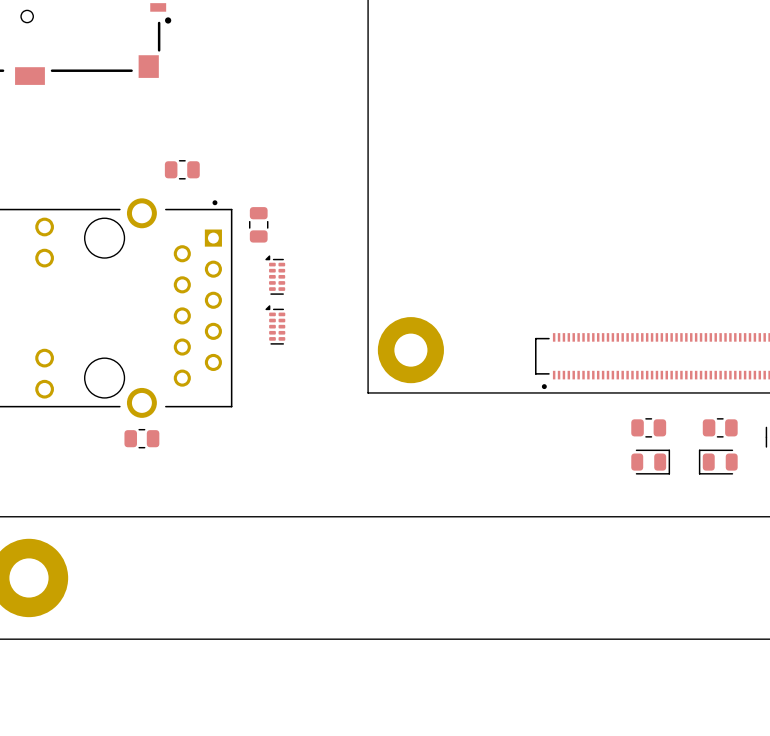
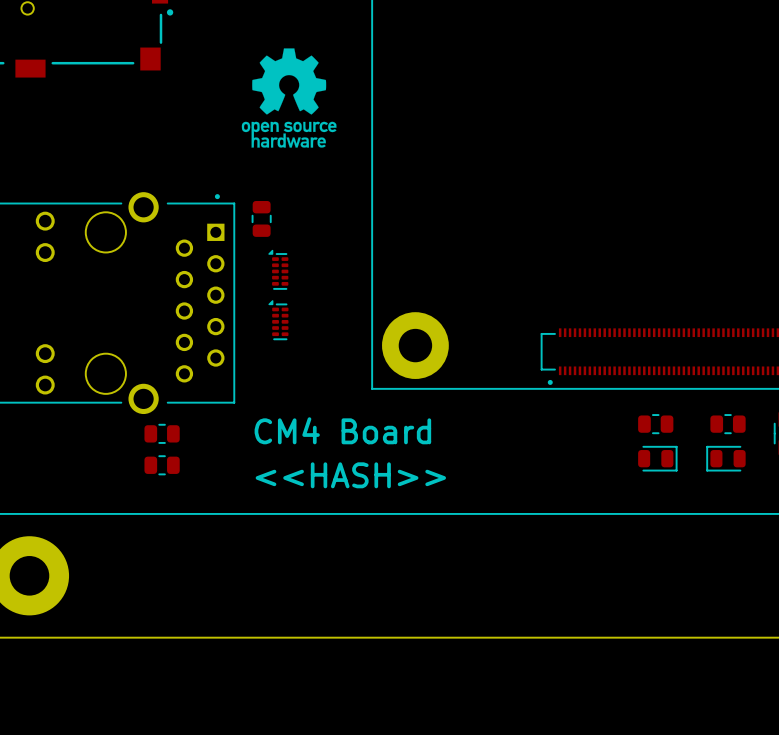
drawing: none -> [241, 48, 337, 148]
part: (182, 169) -> none
text: none -> CM4 Board (342, 430)
part: none -> (162, 433)
part: (141, 438) -> none
part: none -> (162, 465)
text: none -> <<HASH>> (350, 475)

